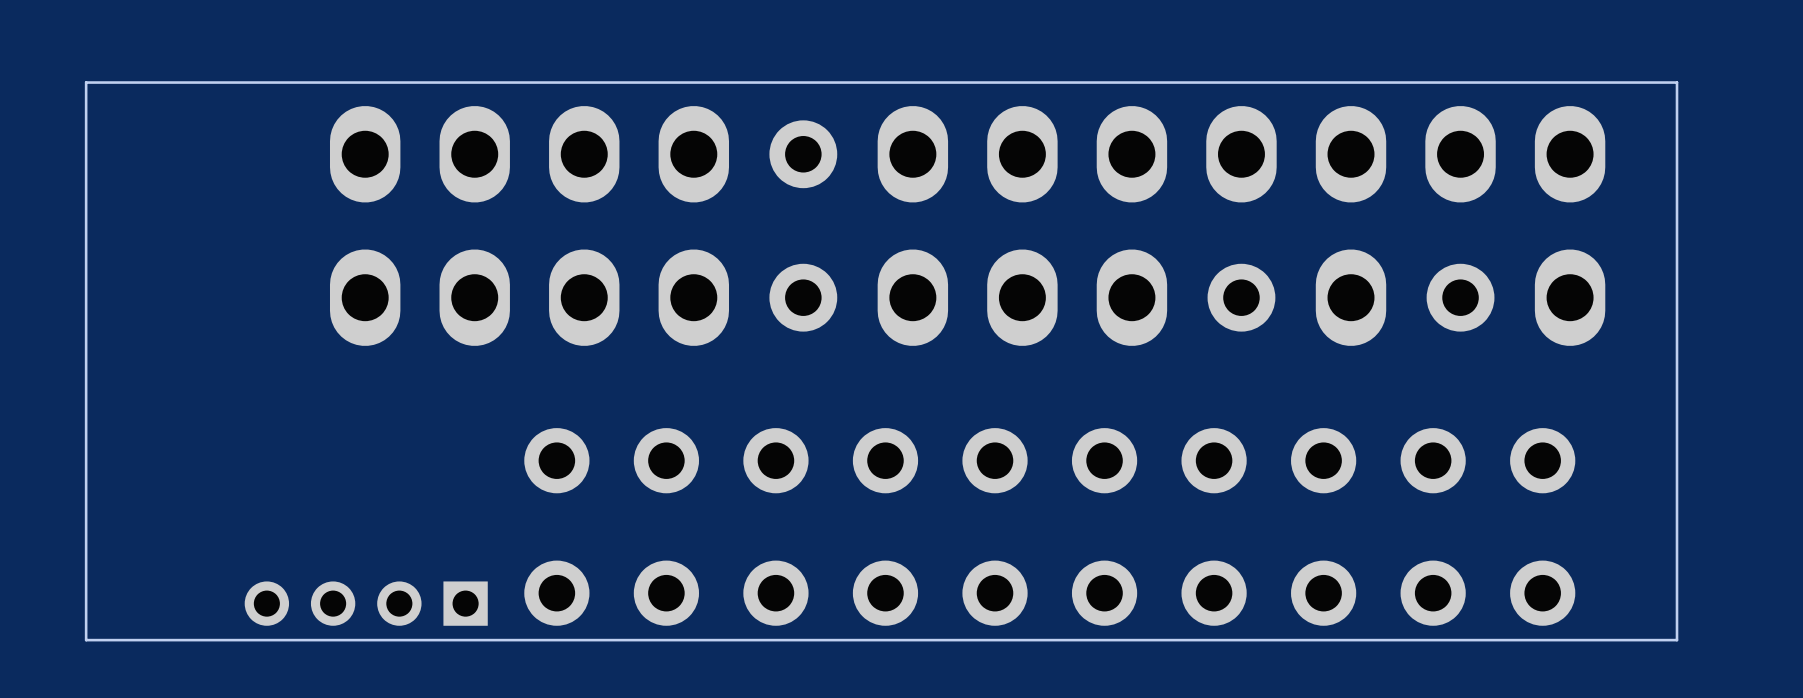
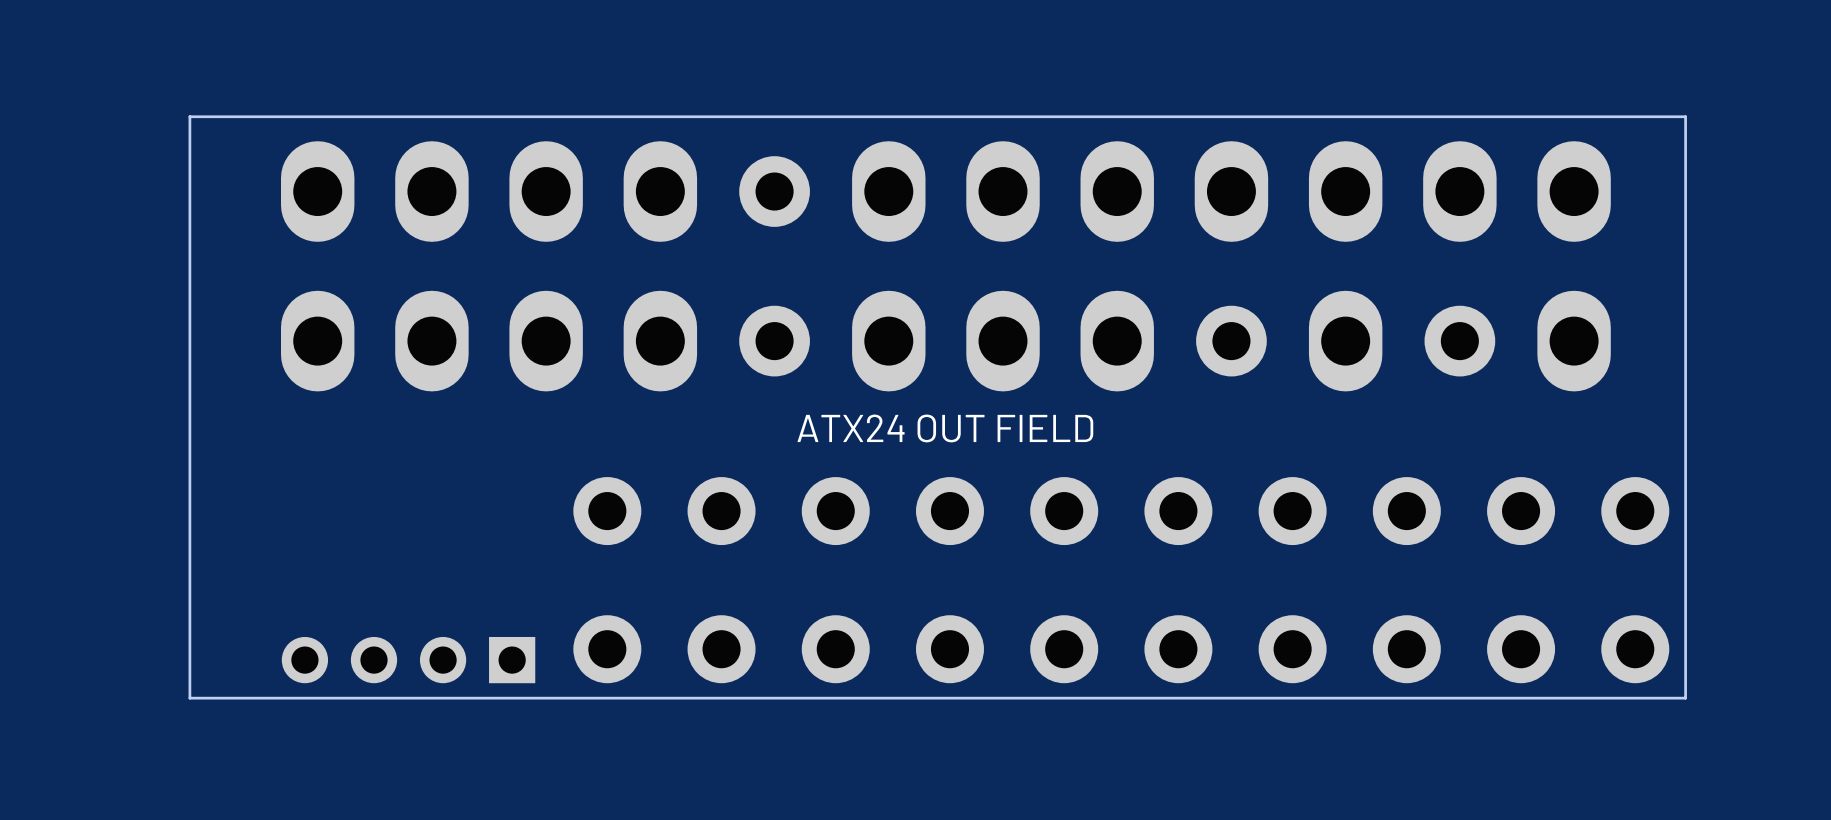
board edge: (156, 82) (86, 82) (86, 640) (156, 640) -> (189, 116) (189, 698)
board edge: (1590, 82) (1677, 82) (1677, 640) (1590, 640) -> (1685, 116) (1685, 698)
part: none -> ATX24 OUT FIELD (945, 266)
part: (967, 225) -> none

